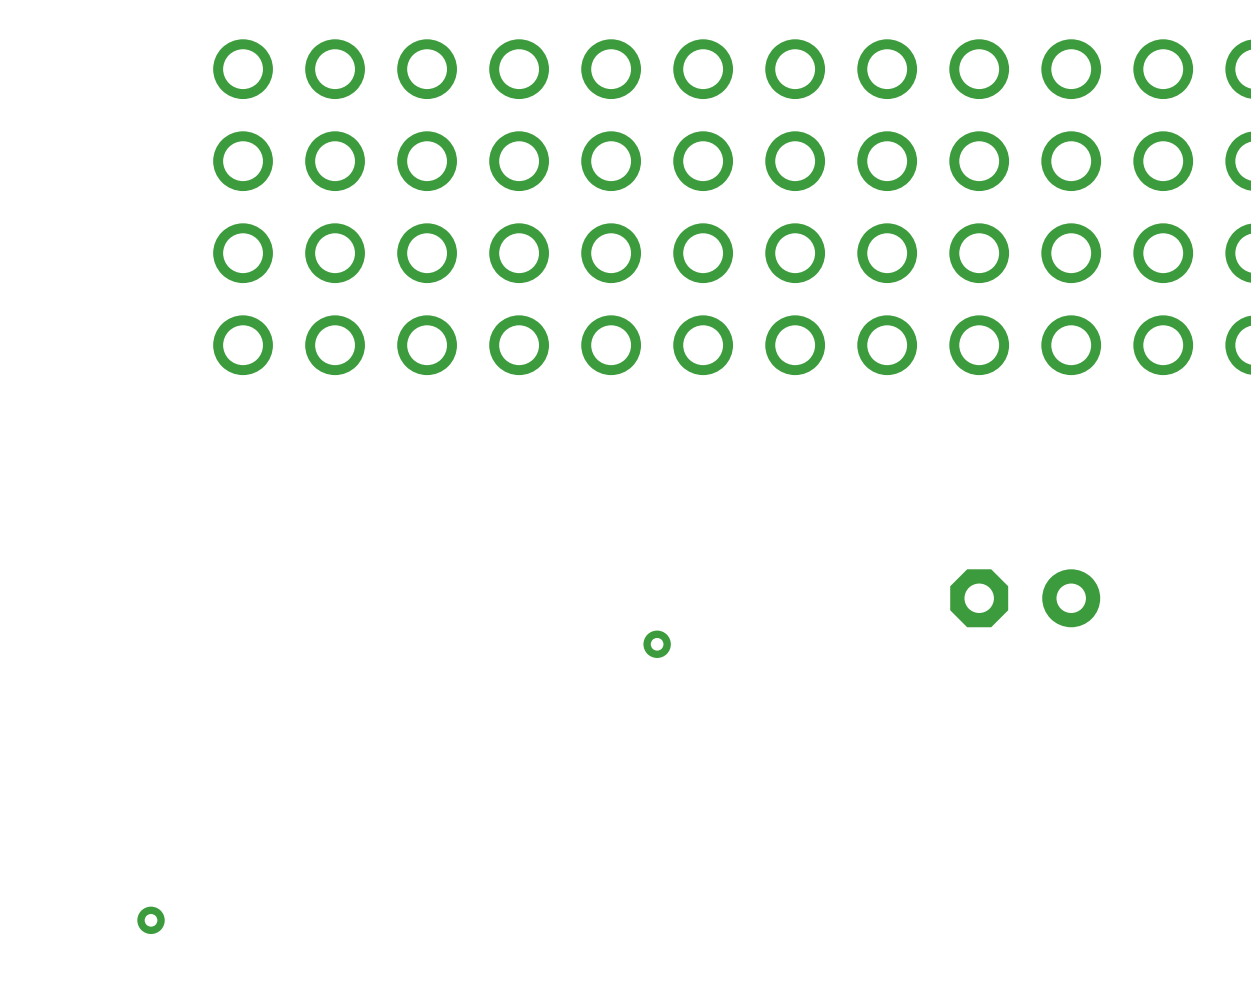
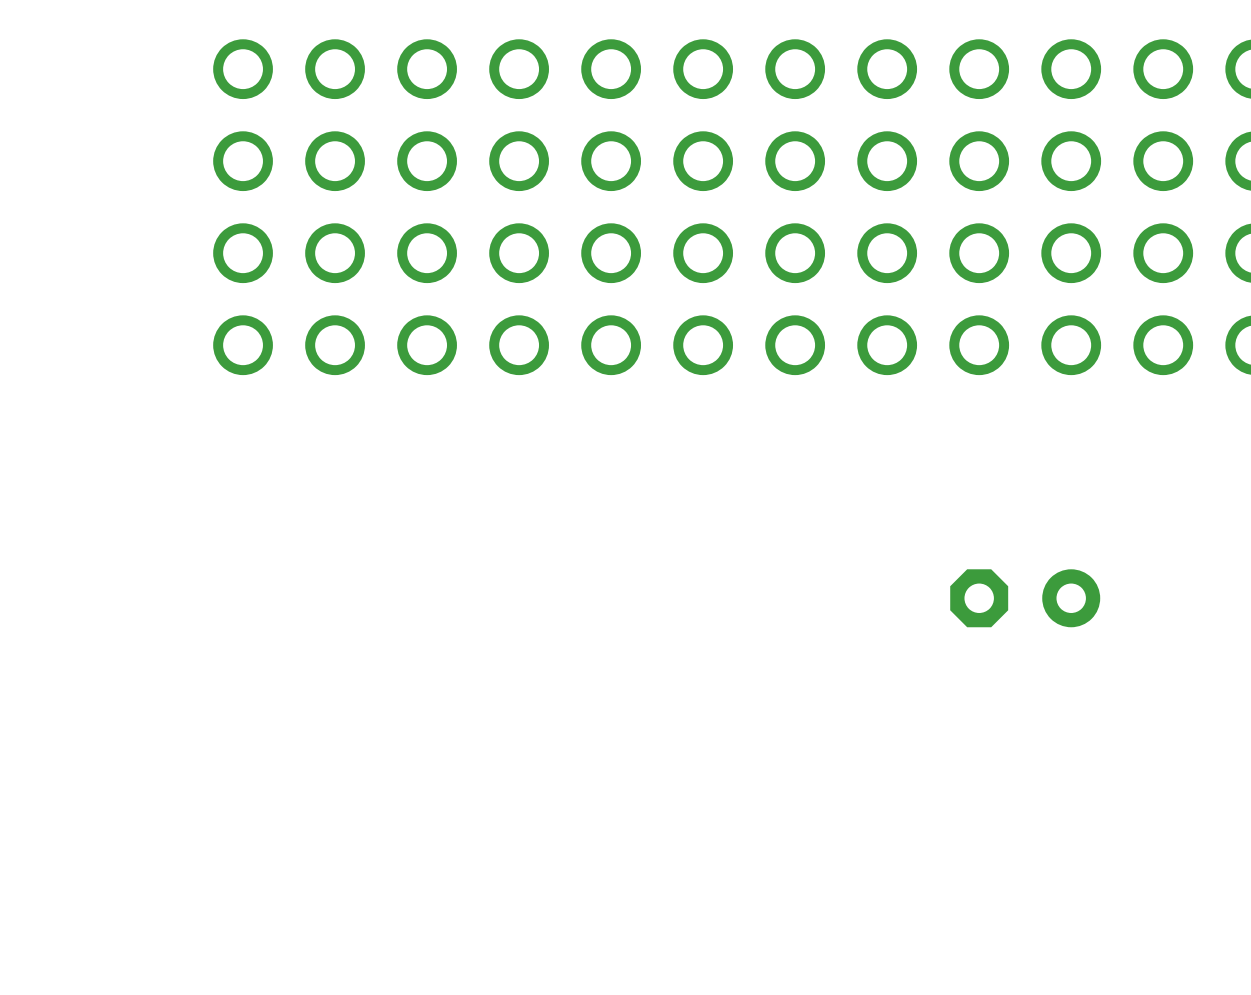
via: (657, 644) -> none
via: (151, 920) -> none

